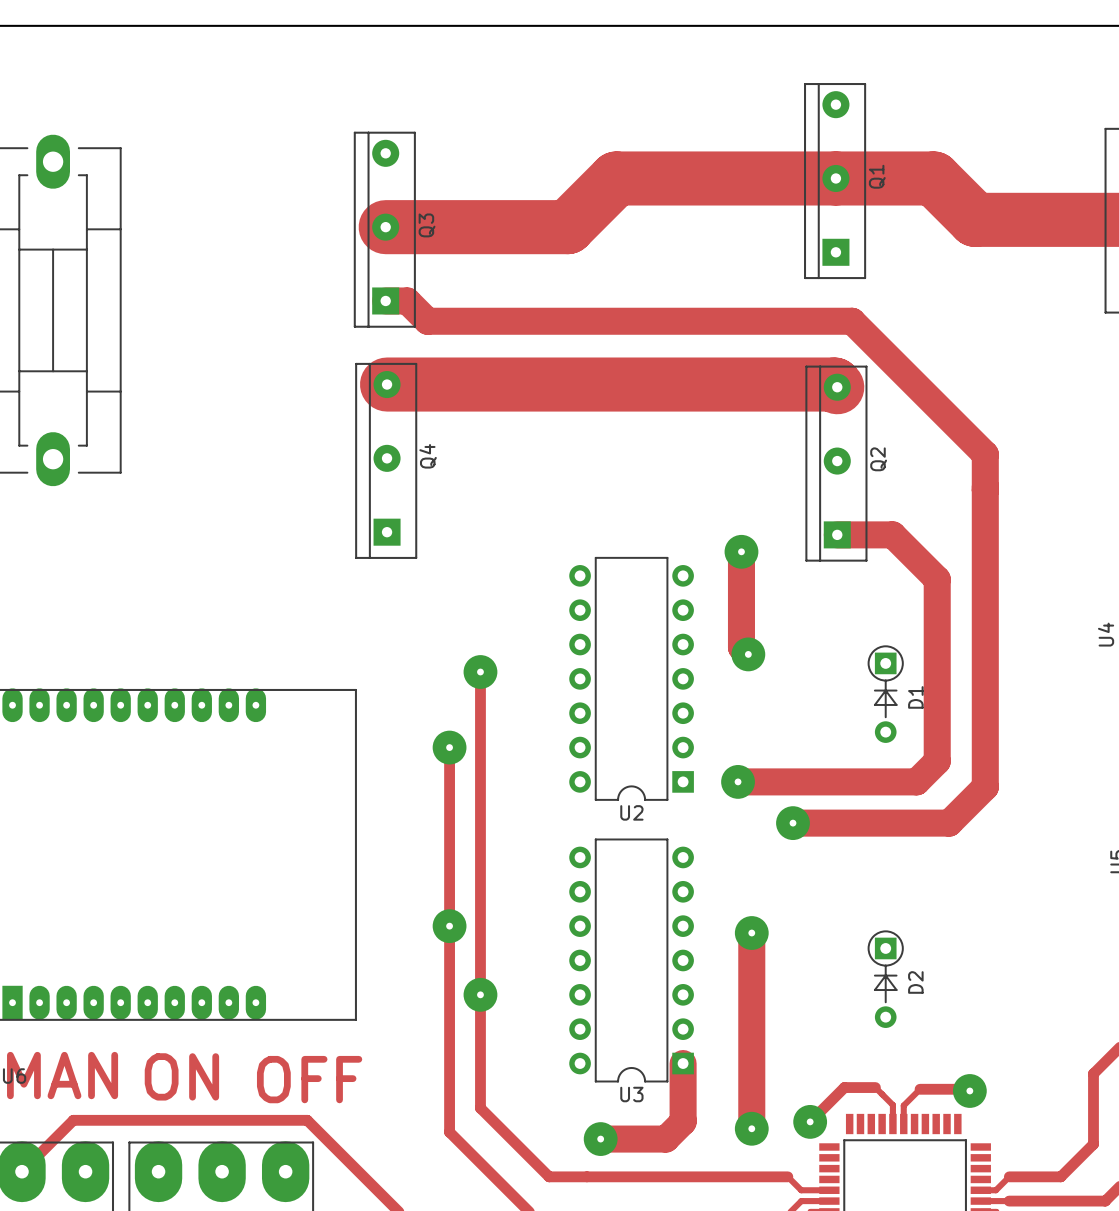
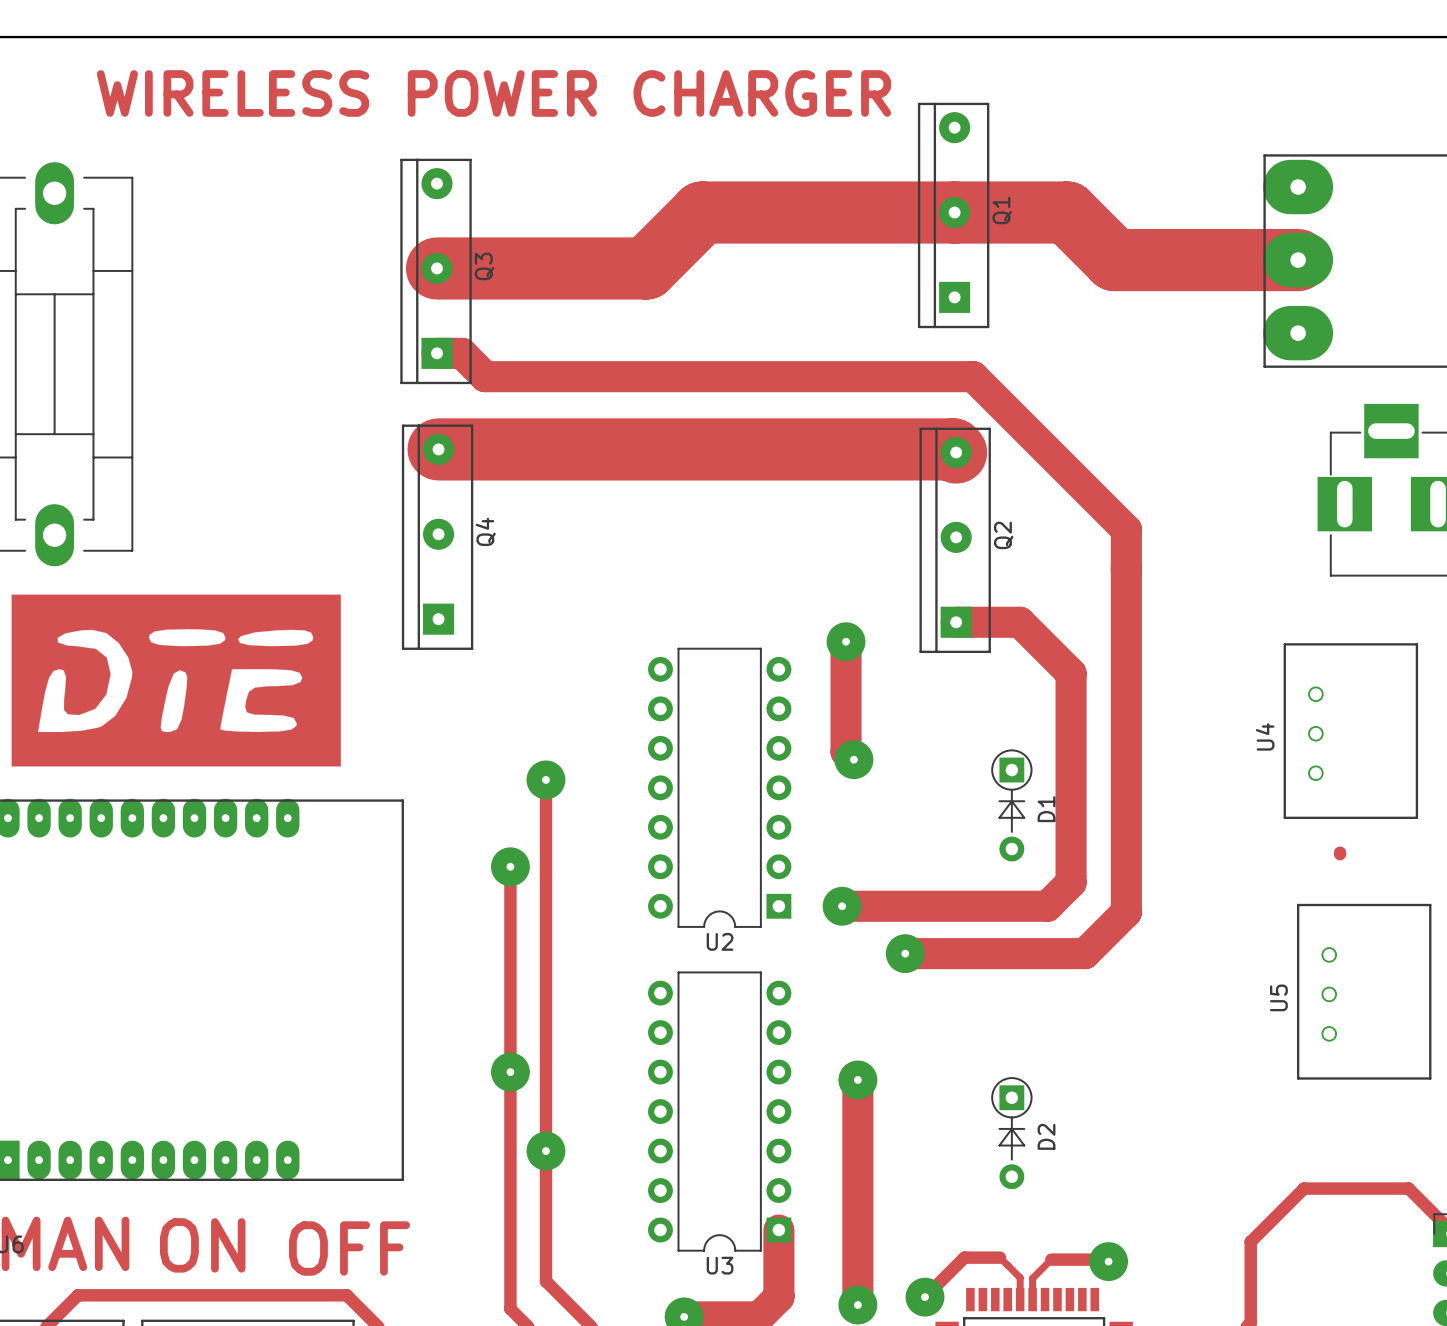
text: none -> WIRELESS POWER CHARGER (493, 93)
drawing: none -> [11, 594, 341, 767]

